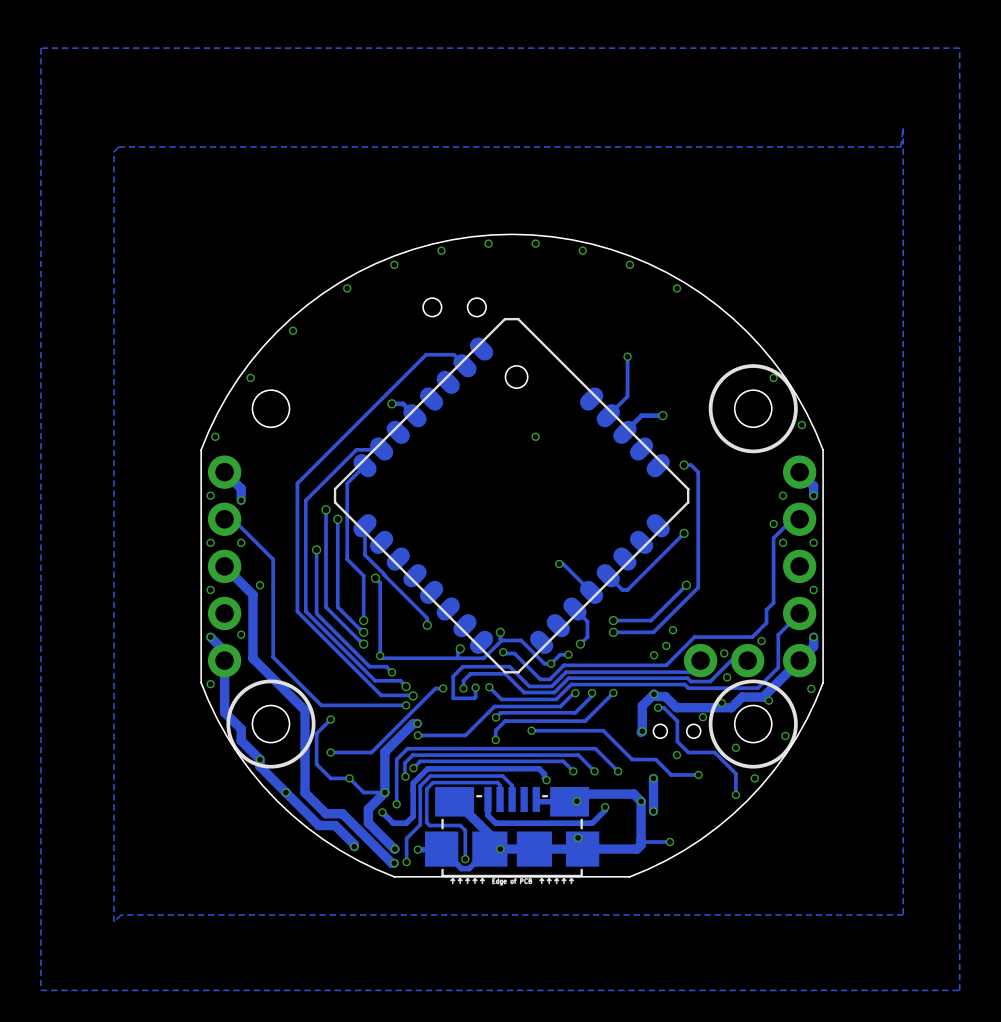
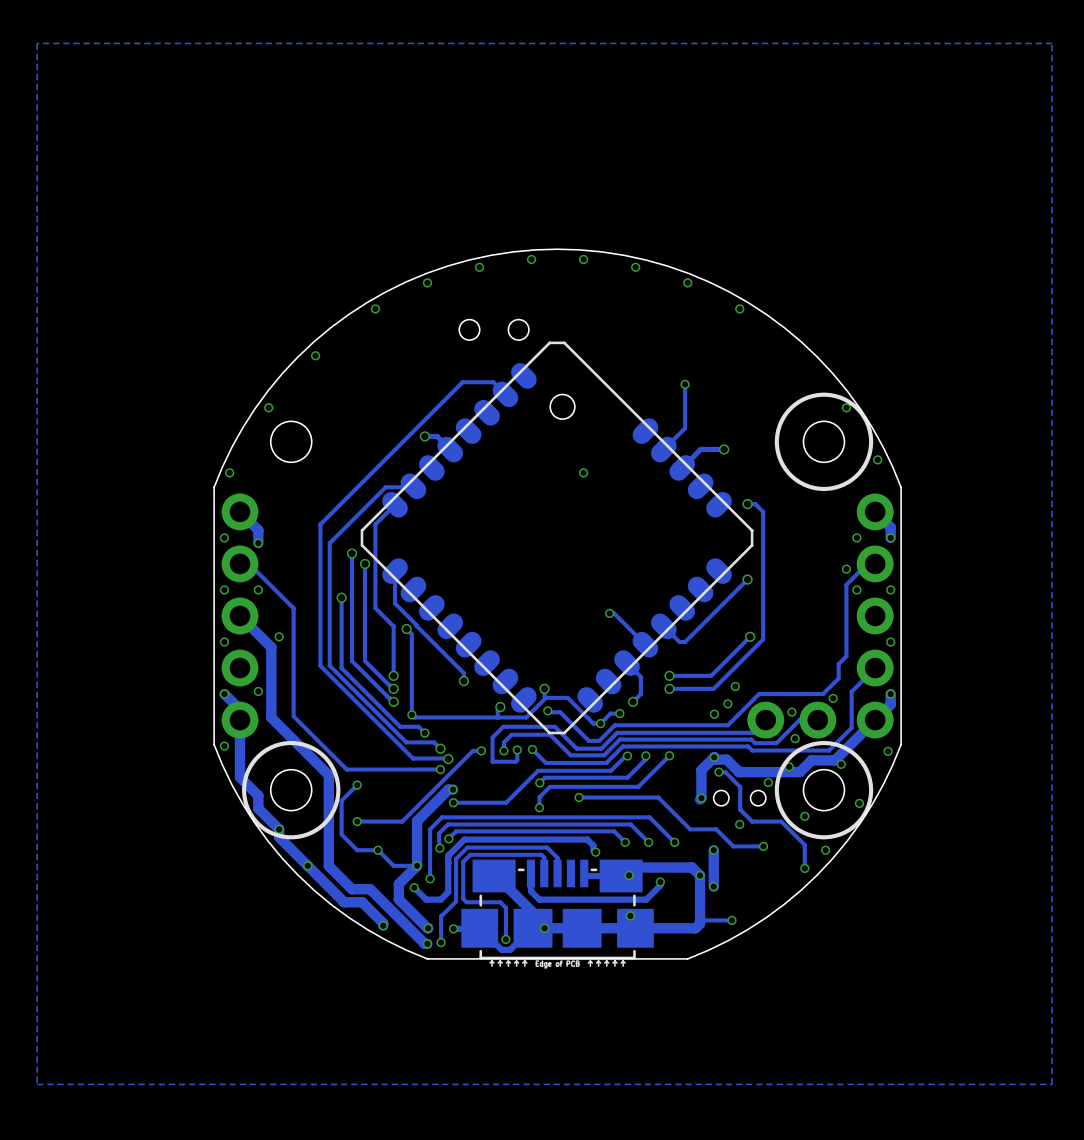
zone outline: (903, 128) (903, 915) (121, 915) (114, 922) (114, 151) (118, 147) (900, 147) (903, 128) -> none

